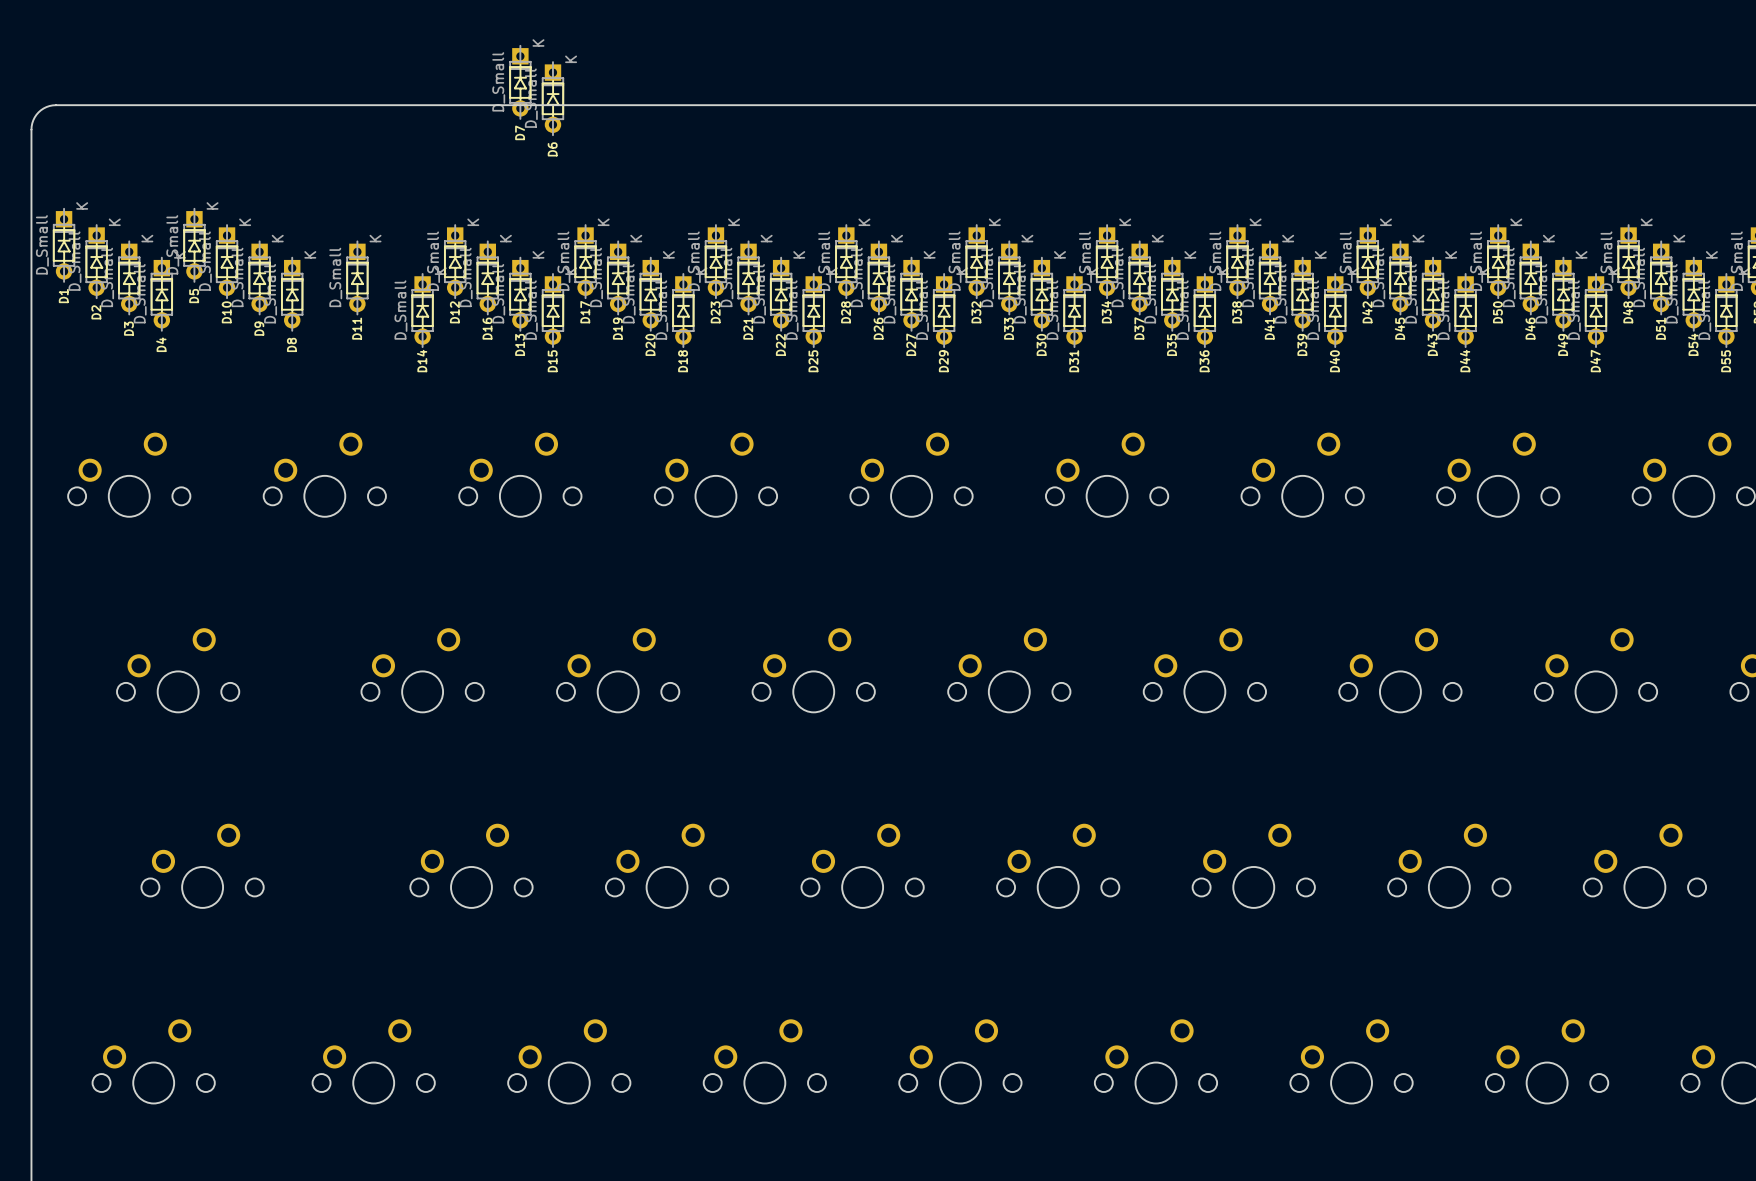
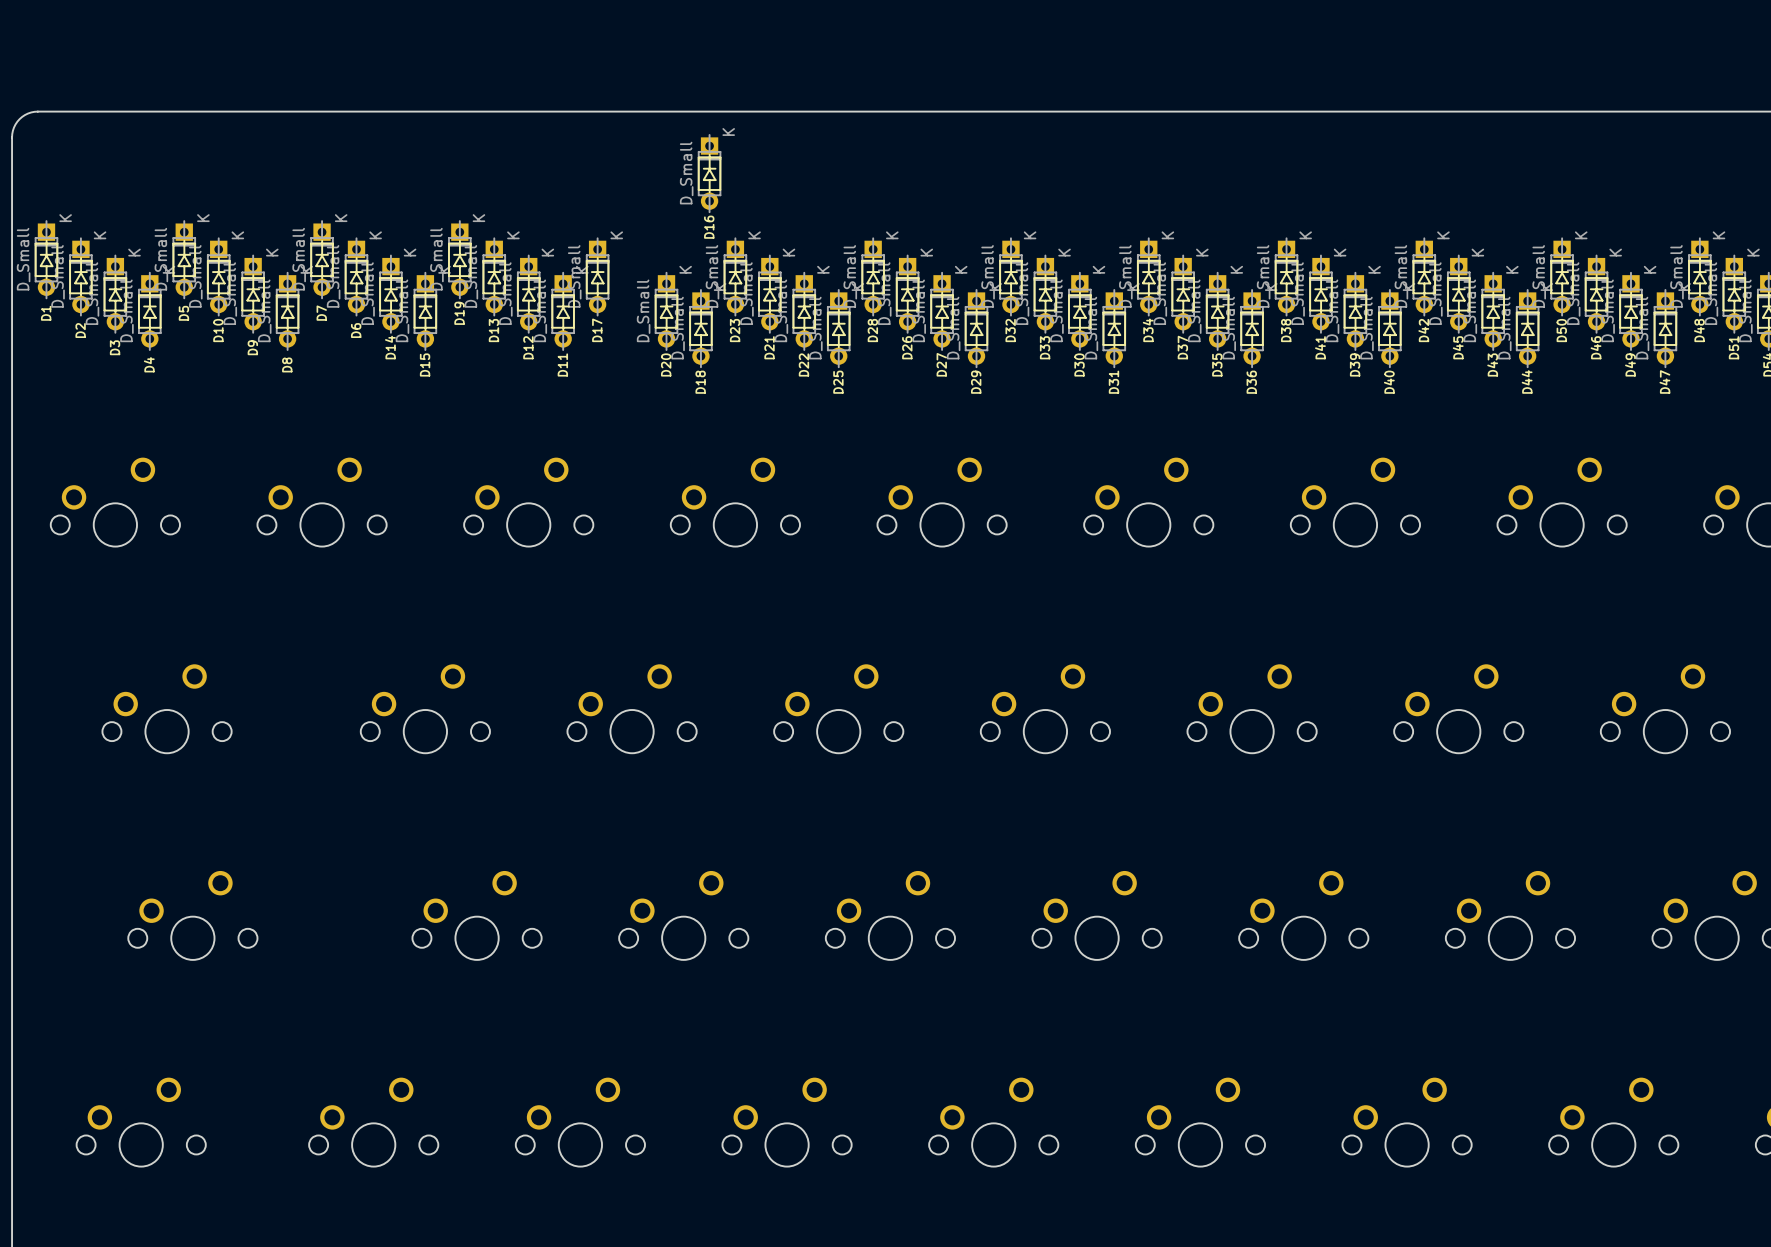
D7 position: (520, 82) -> (322, 259)
D6 position: (552, 98) -> (356, 276)
D12 position: (455, 261) -> (528, 294)
D11 position: (357, 277) -> (563, 311)
D16 position: (487, 277) -> (709, 173)
D19 position: (618, 277) -> (459, 259)
D13 position: (520, 294) -> (494, 276)
D14 position: (422, 310) -> (390, 294)
D15 position: (552, 310) -> (425, 311)

